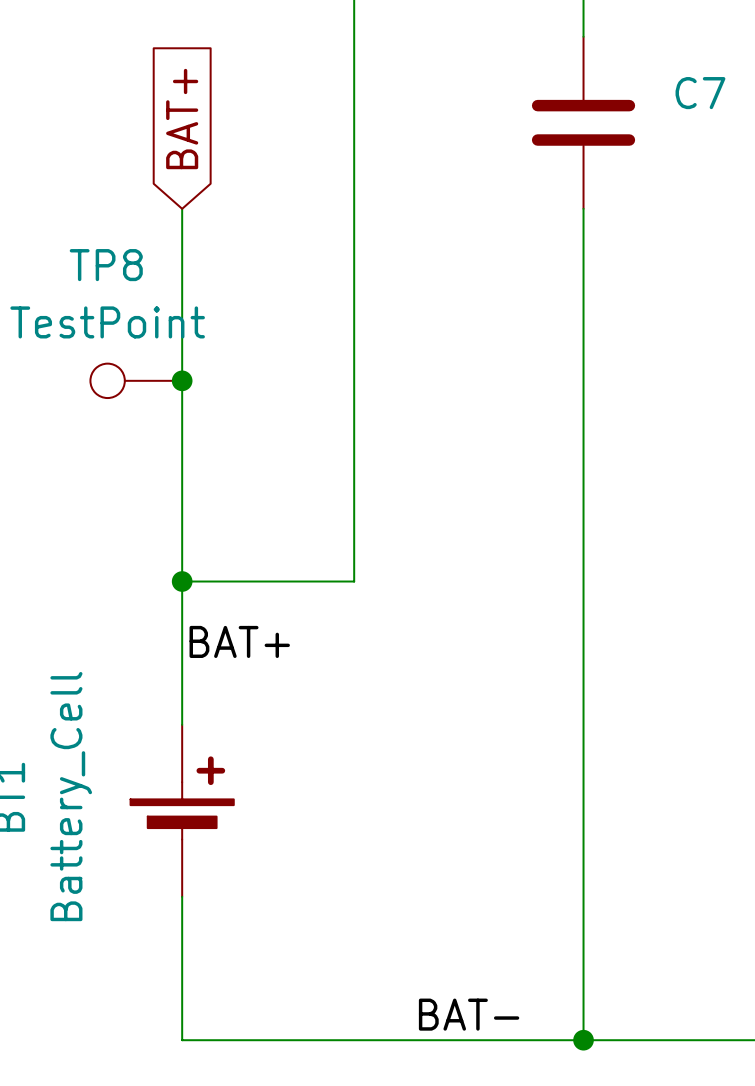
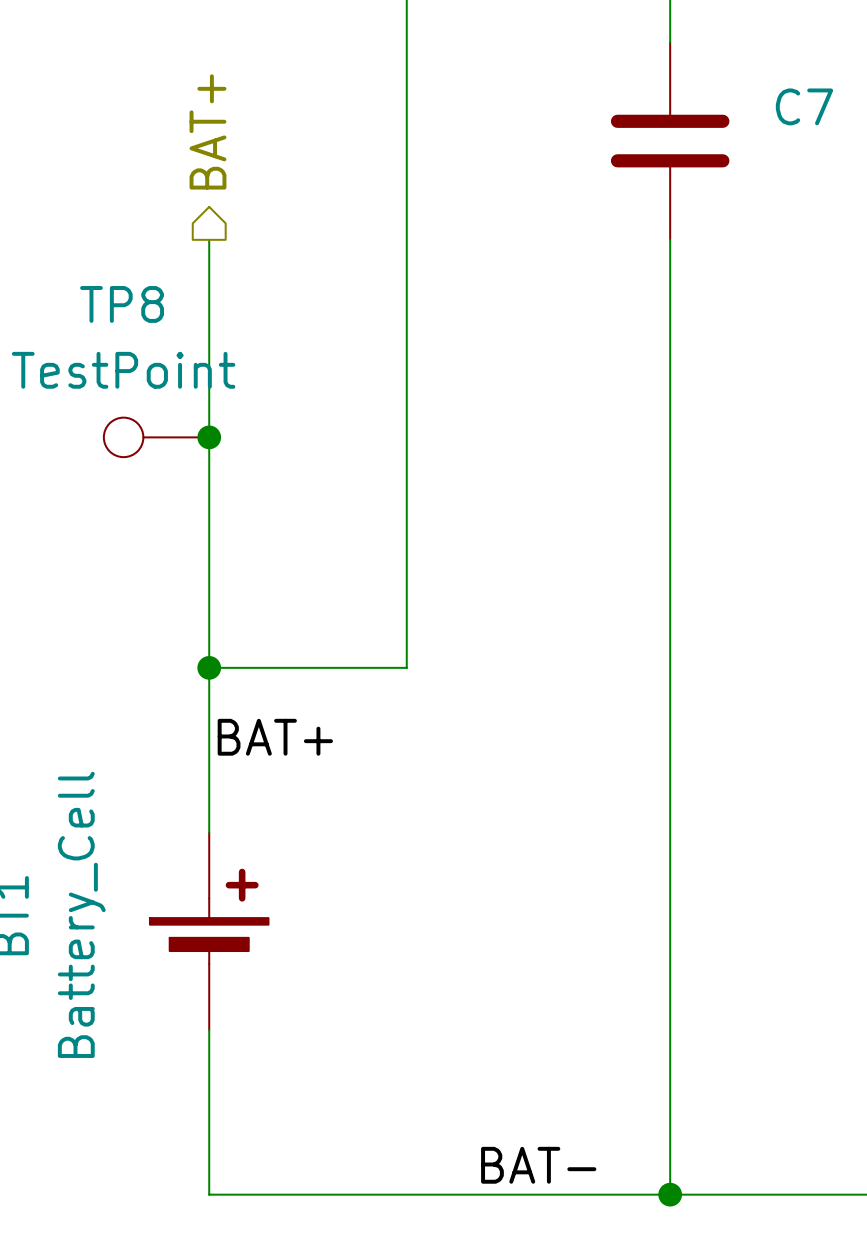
hierarchical label: none -> BAT+ (207, 131)
global label: BAT+ (182, 119) -> none

